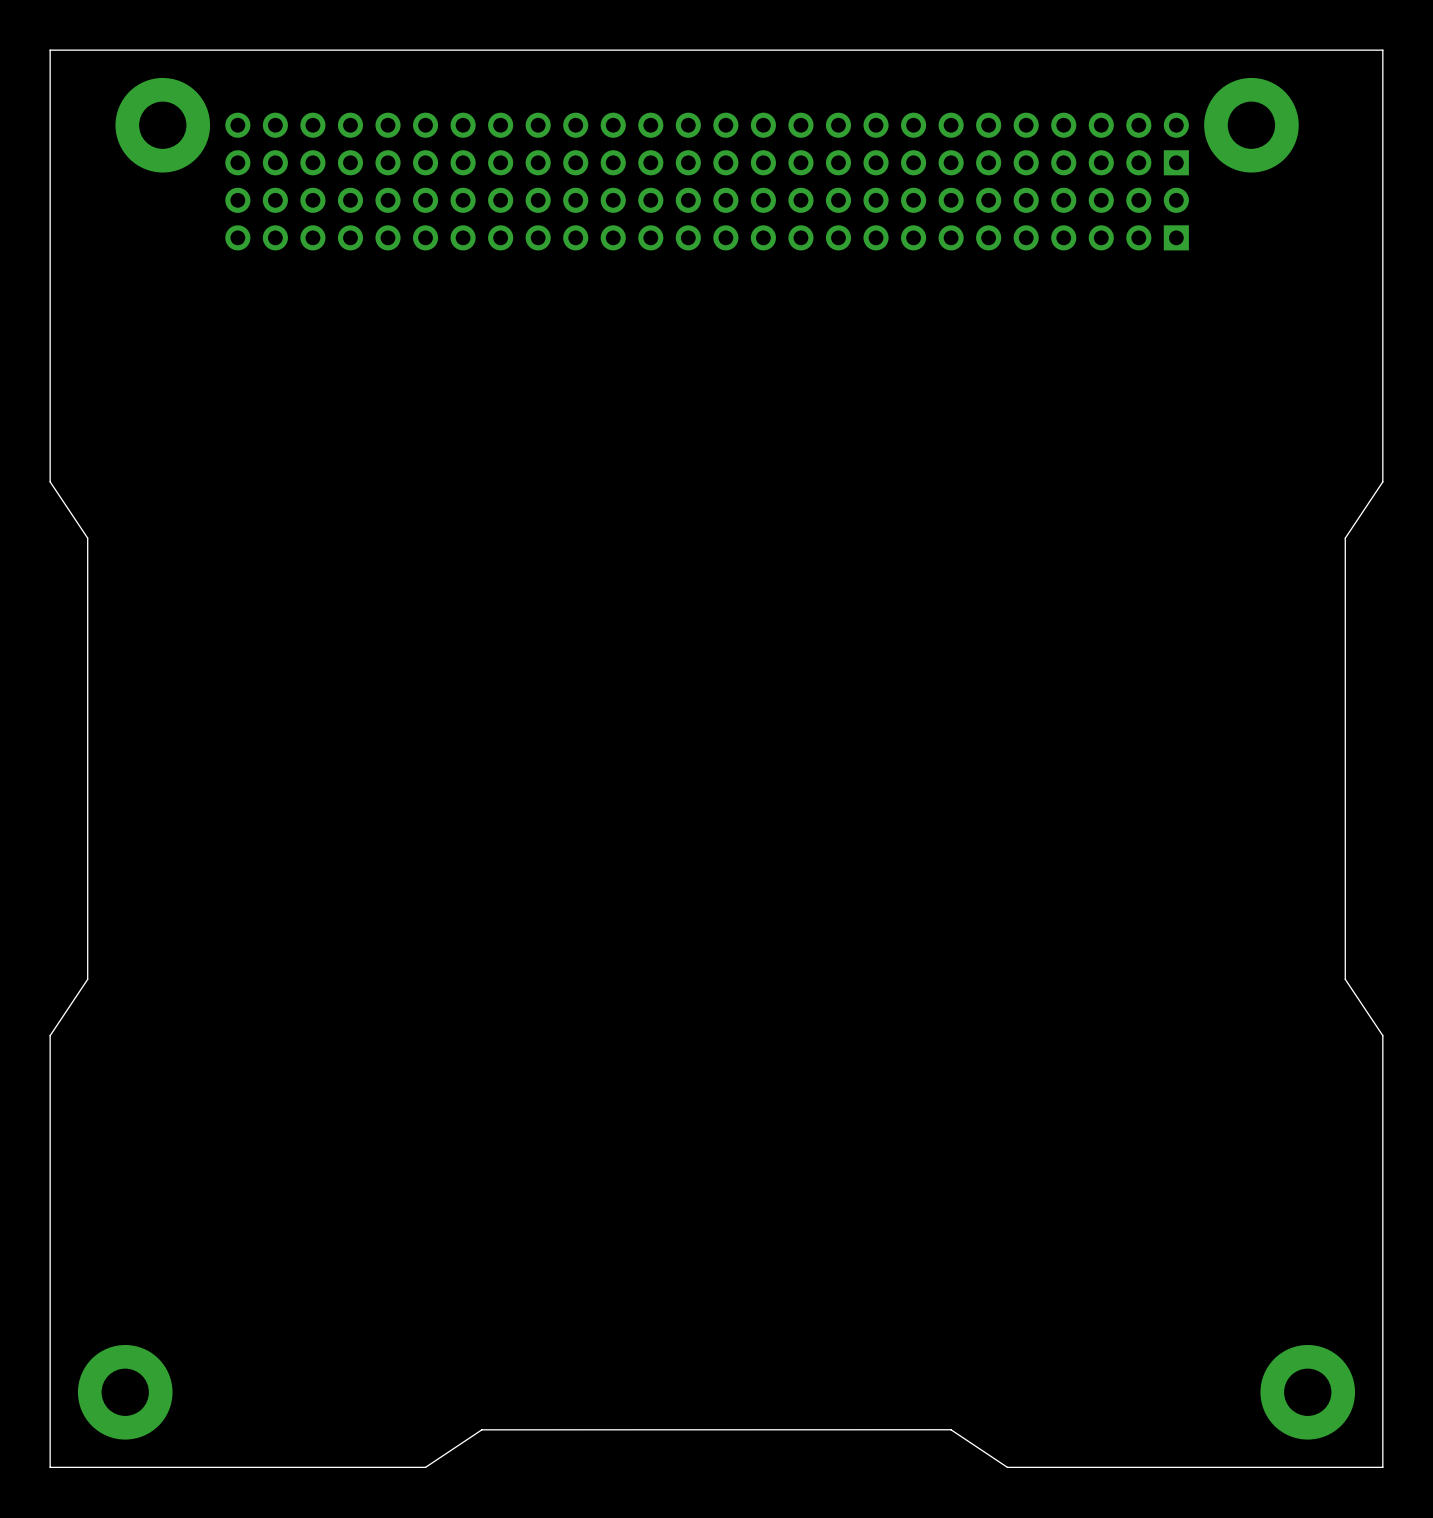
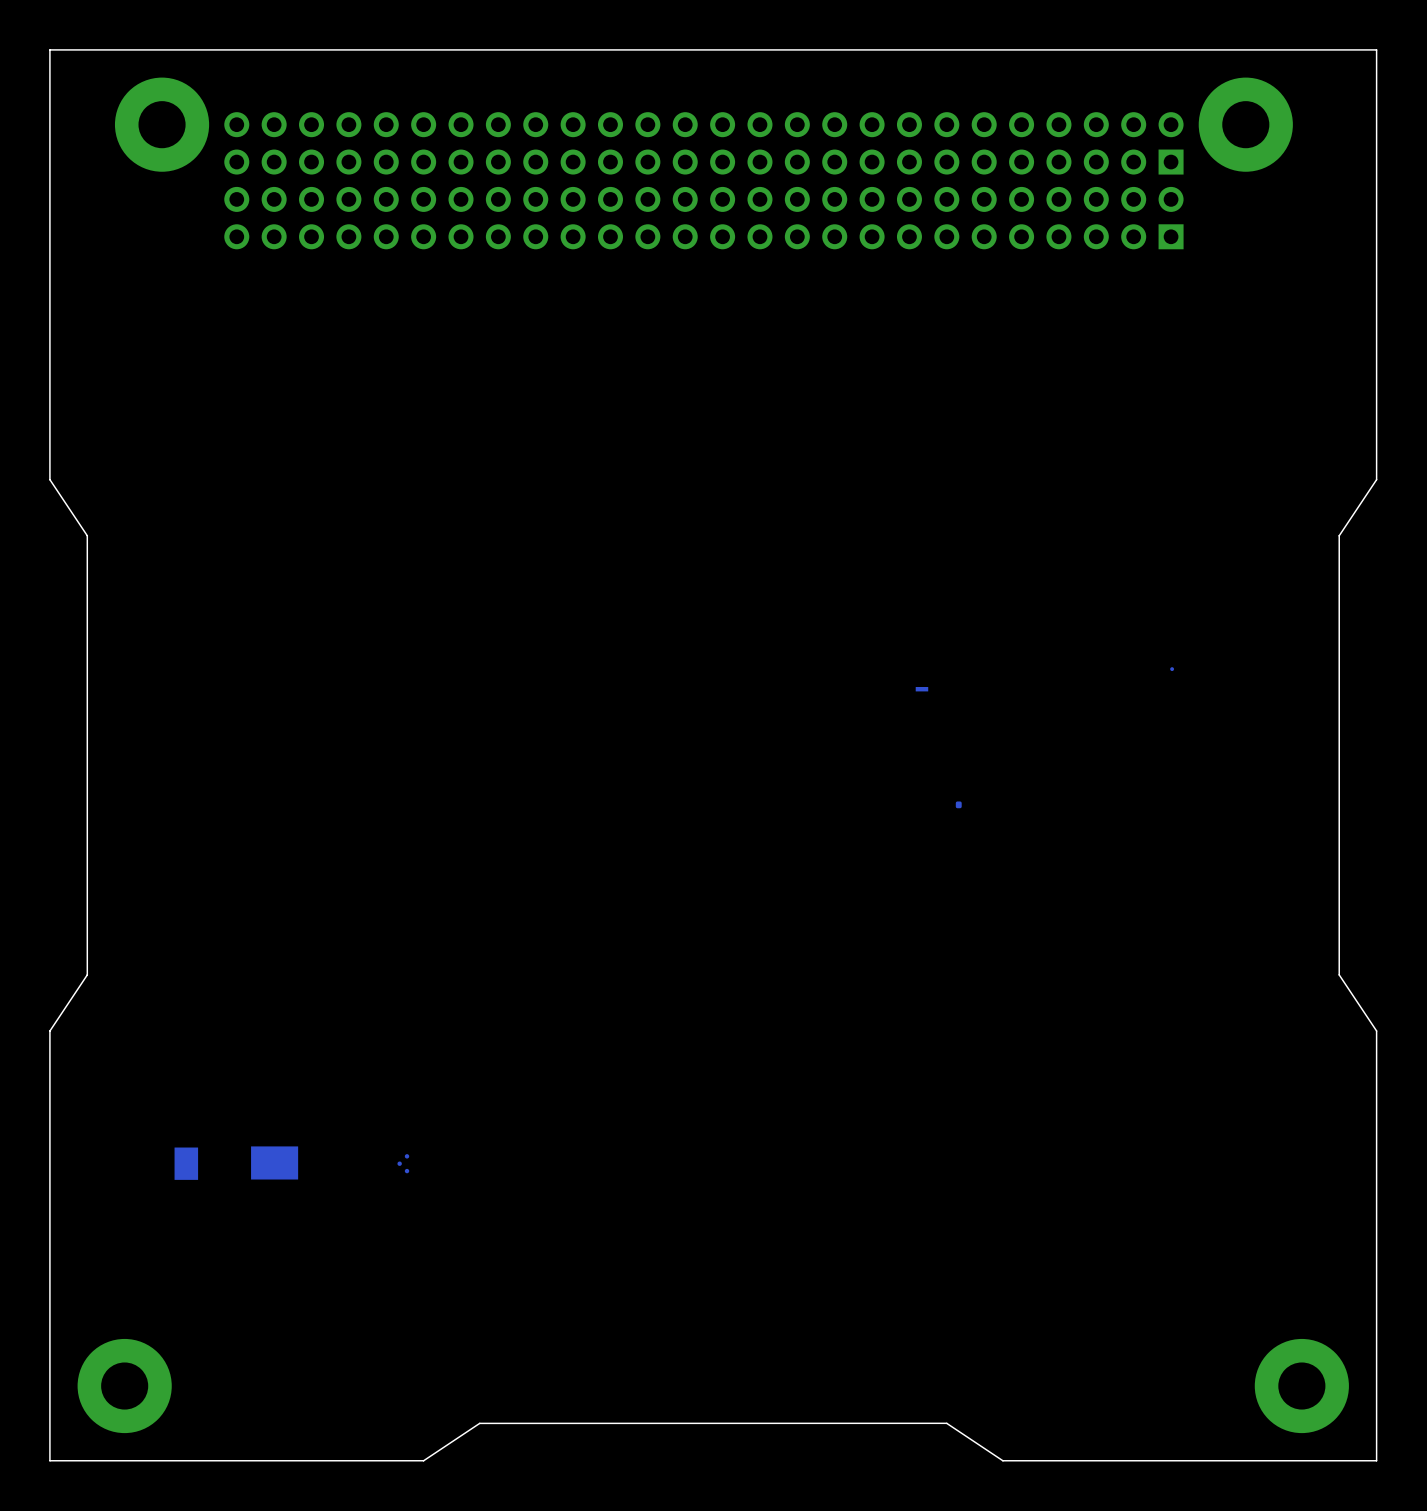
part: none -> (1172, 669)
part: none -> (921, 689)
part: none -> (958, 804)
part: none -> (186, 1163)
part: none -> (274, 1162)
part: none -> (403, 1163)

